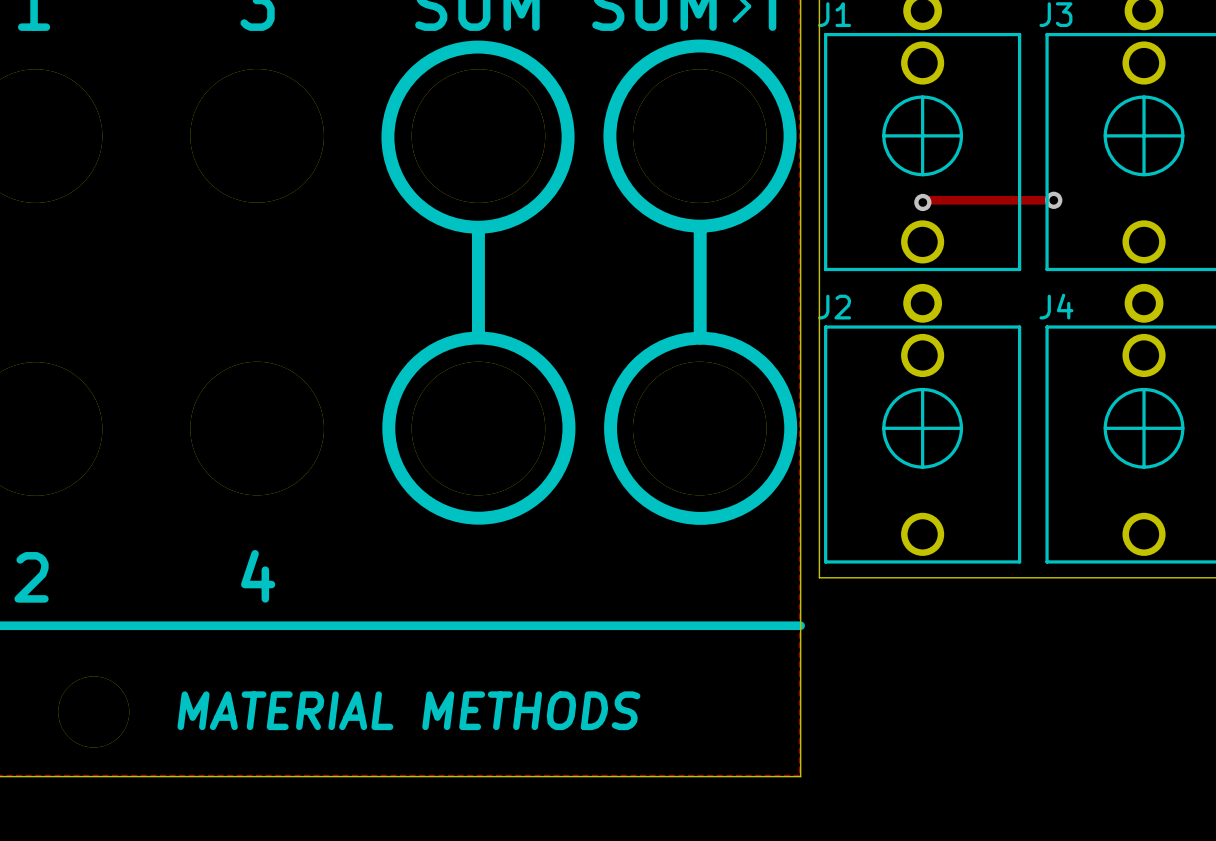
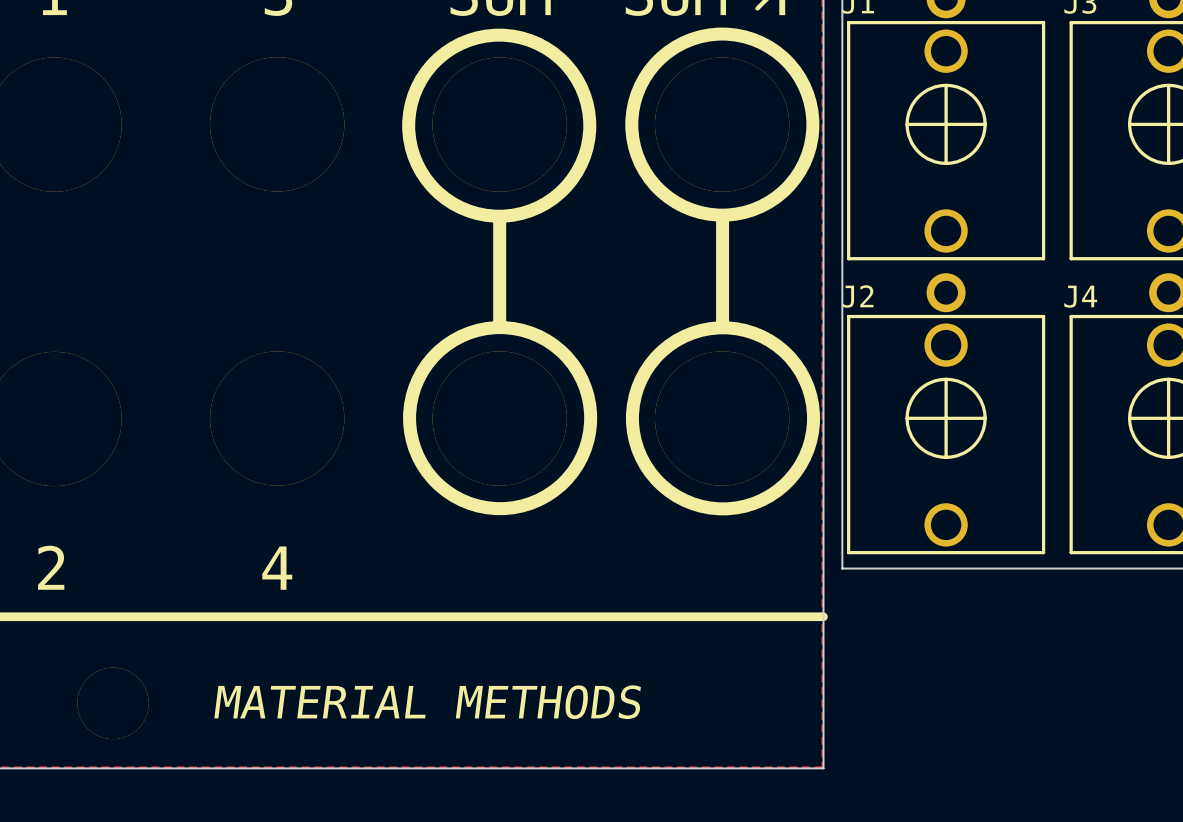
track: (1053, 200) (925, 200) (922, 202) -> none
via: (1053, 200) -> none
via: (922, 202) -> none

